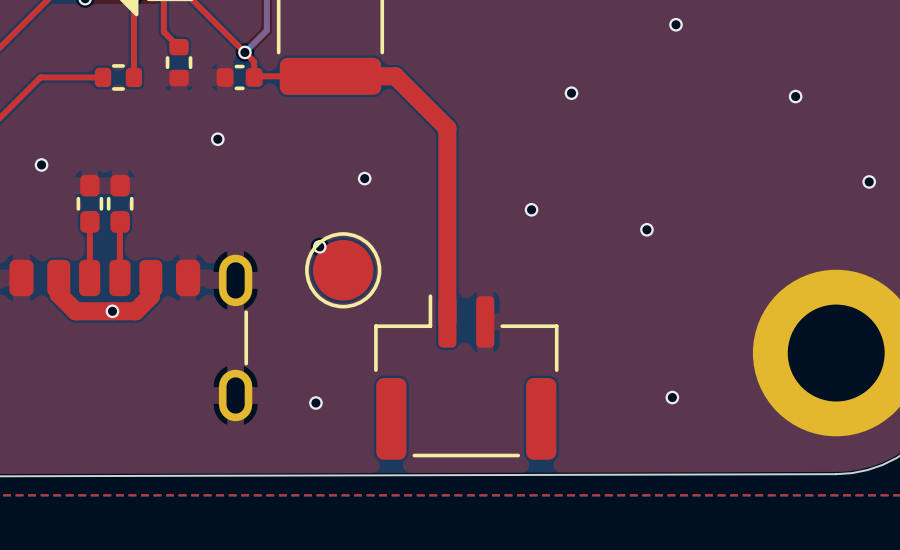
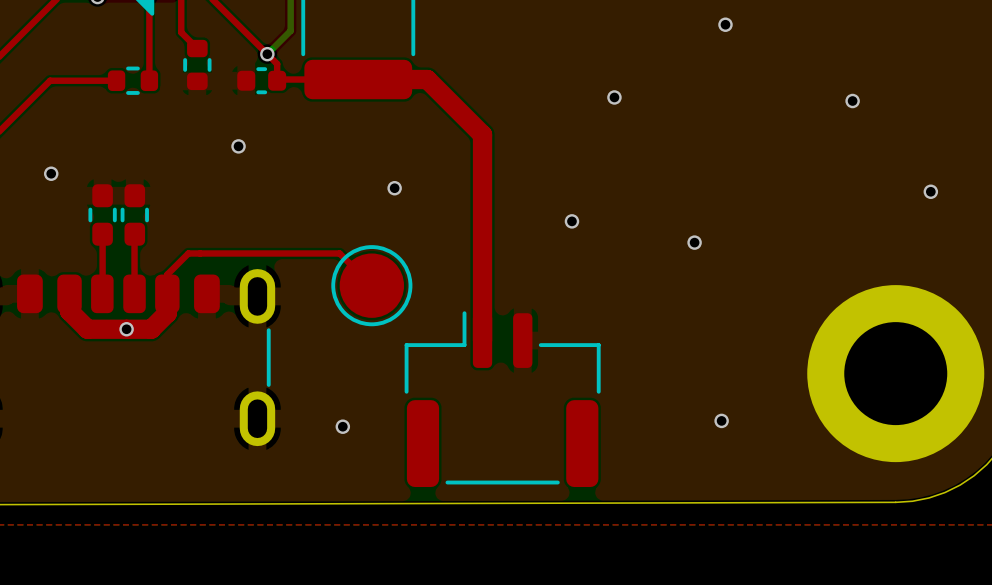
top track: none -> (346, 260) (339, 253) (188, 253) (167, 274) (167, 293)
via: (319, 246) -> none

